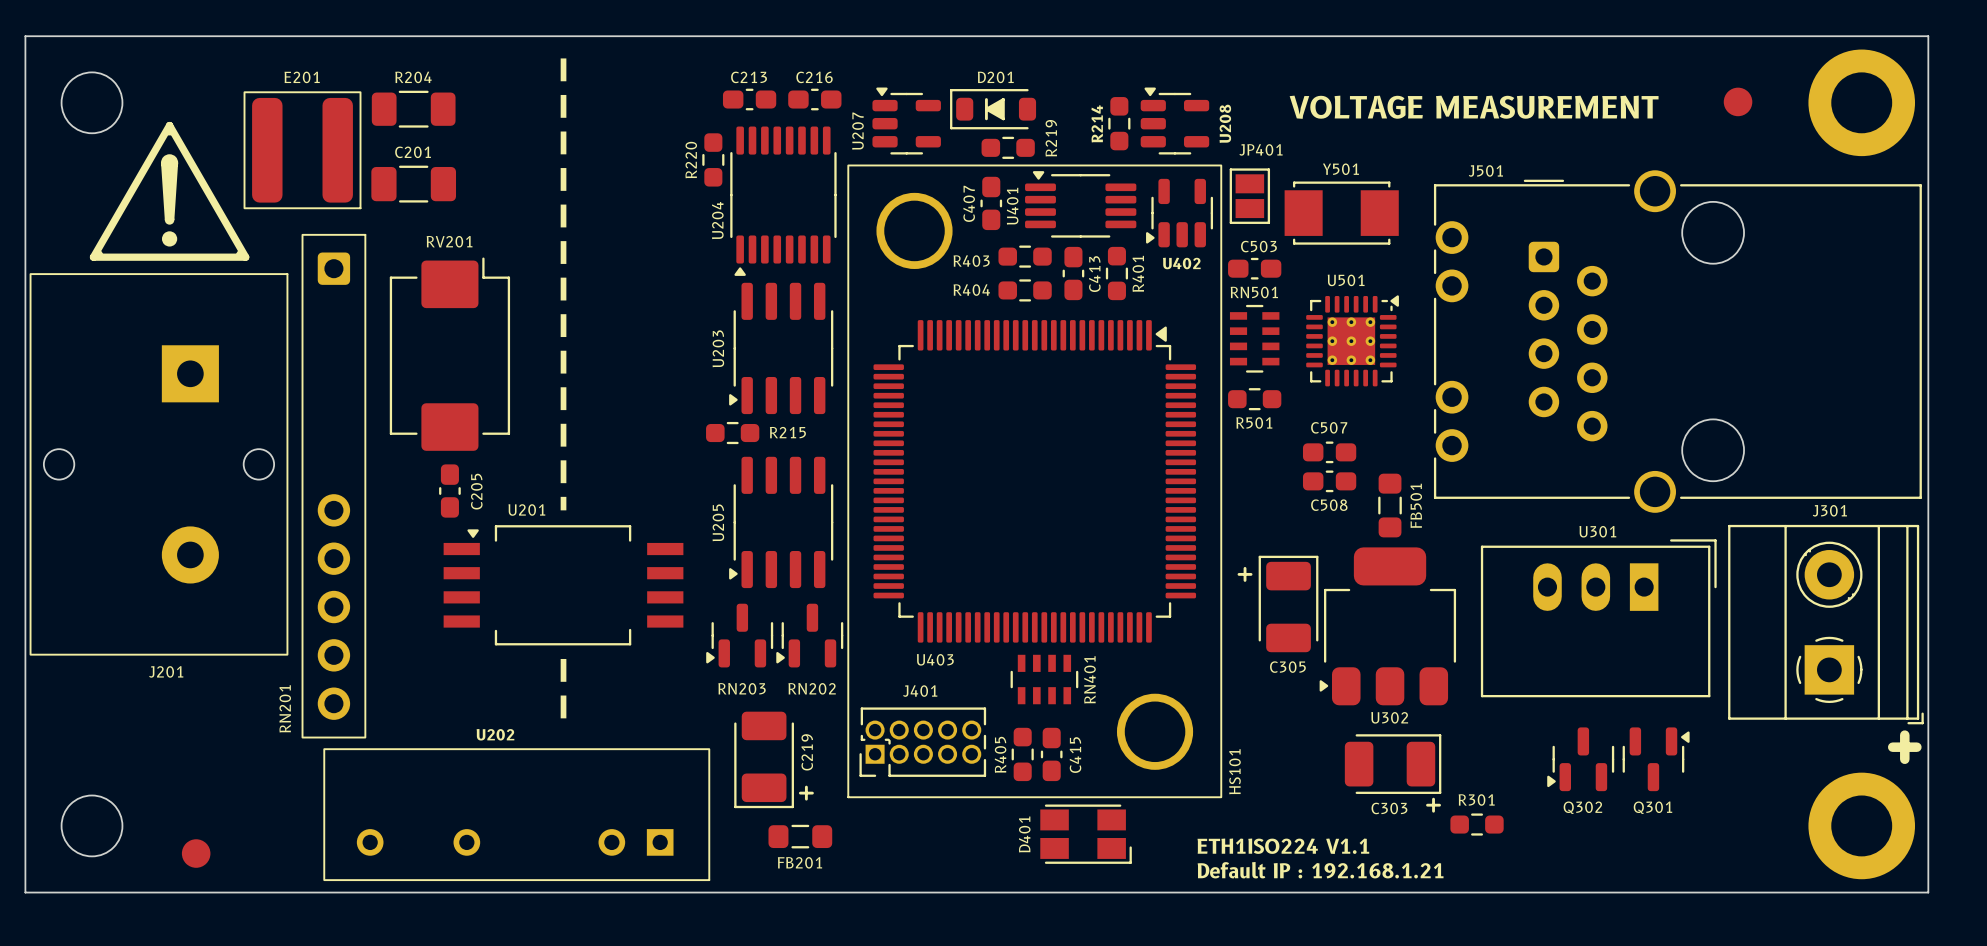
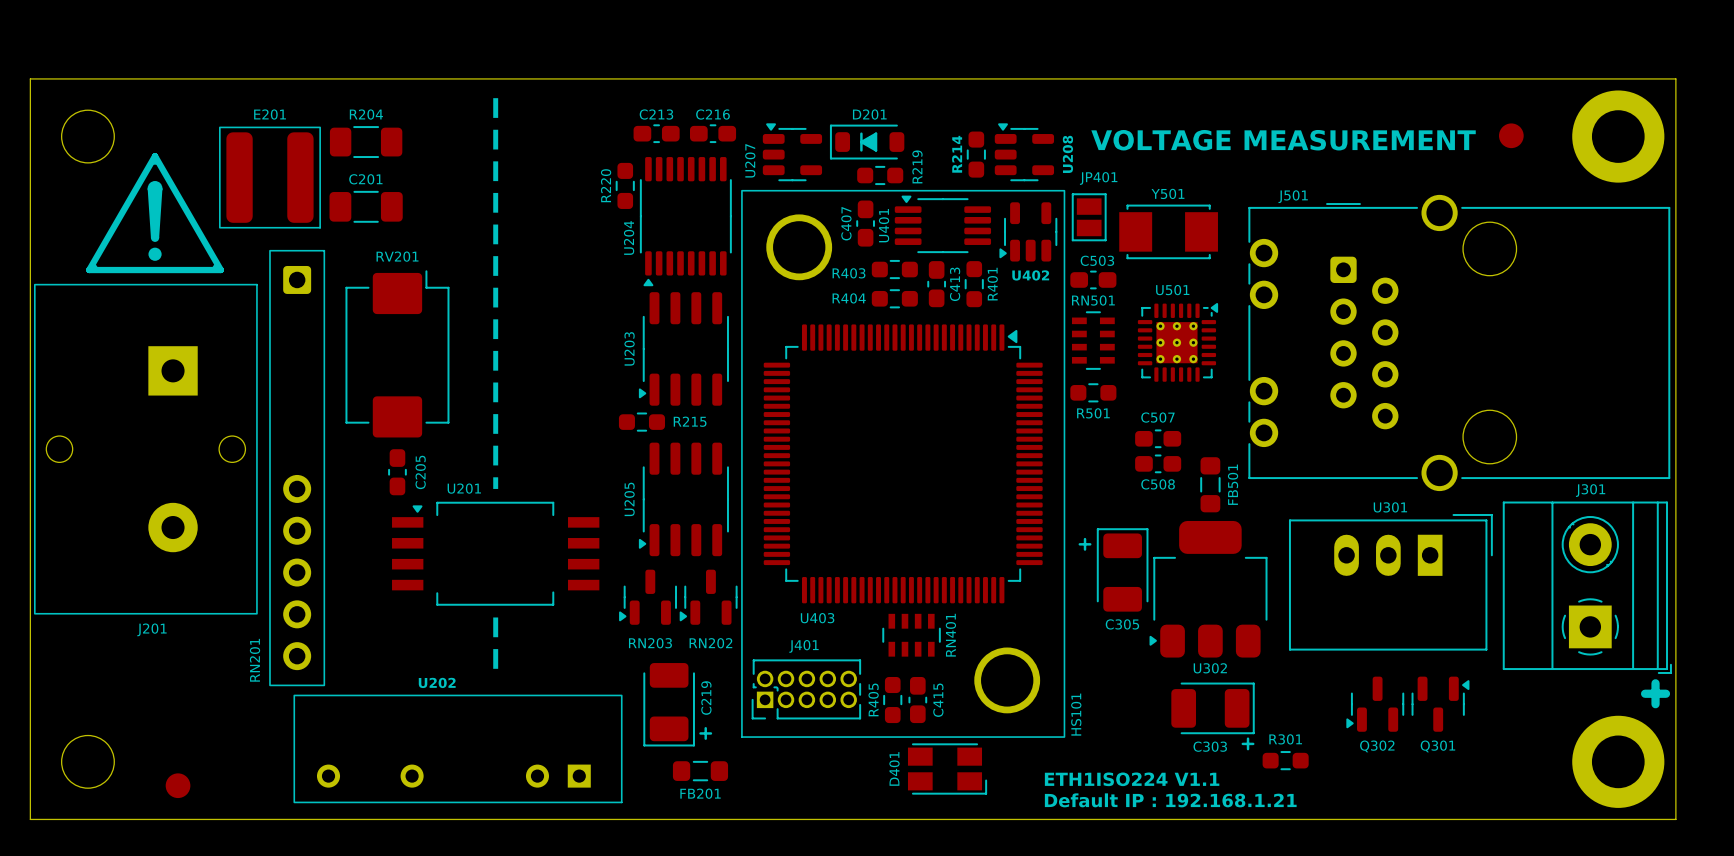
U202 footprint: [323, 748, 711, 882] -> [293, 694, 623, 804]

